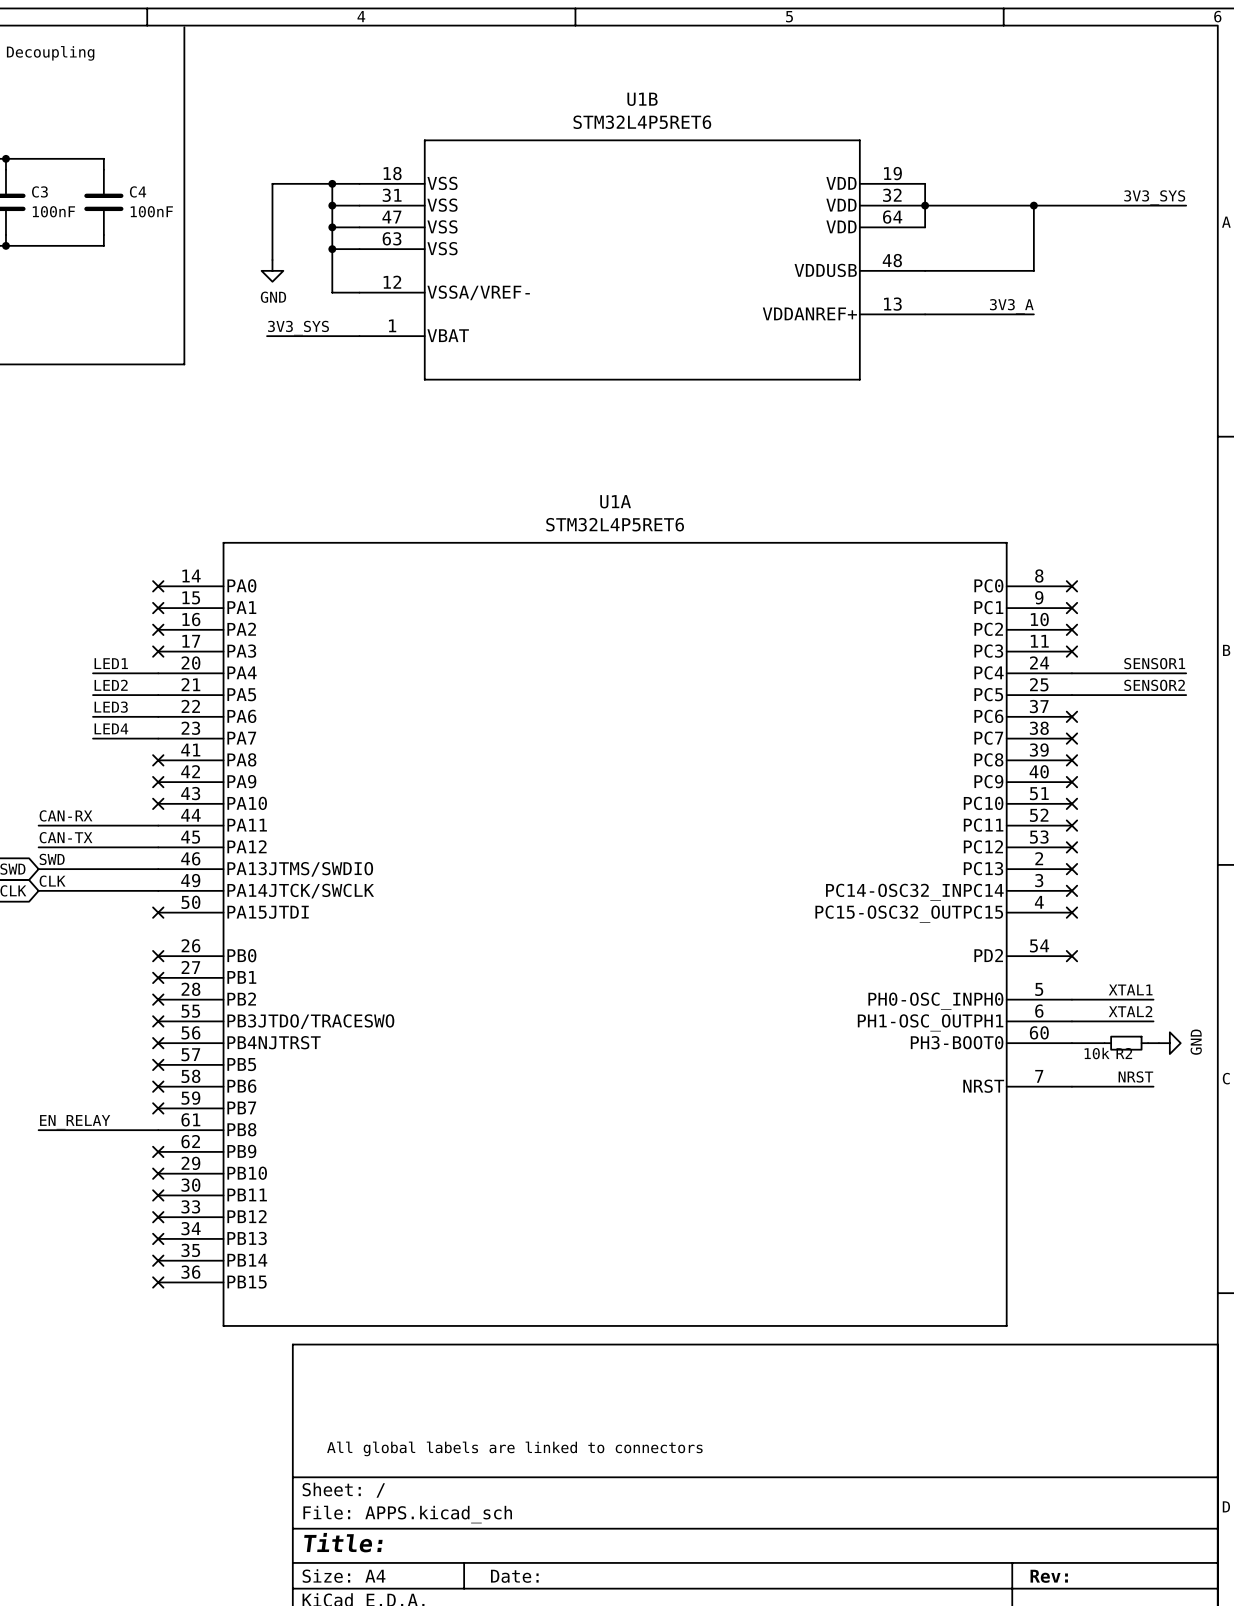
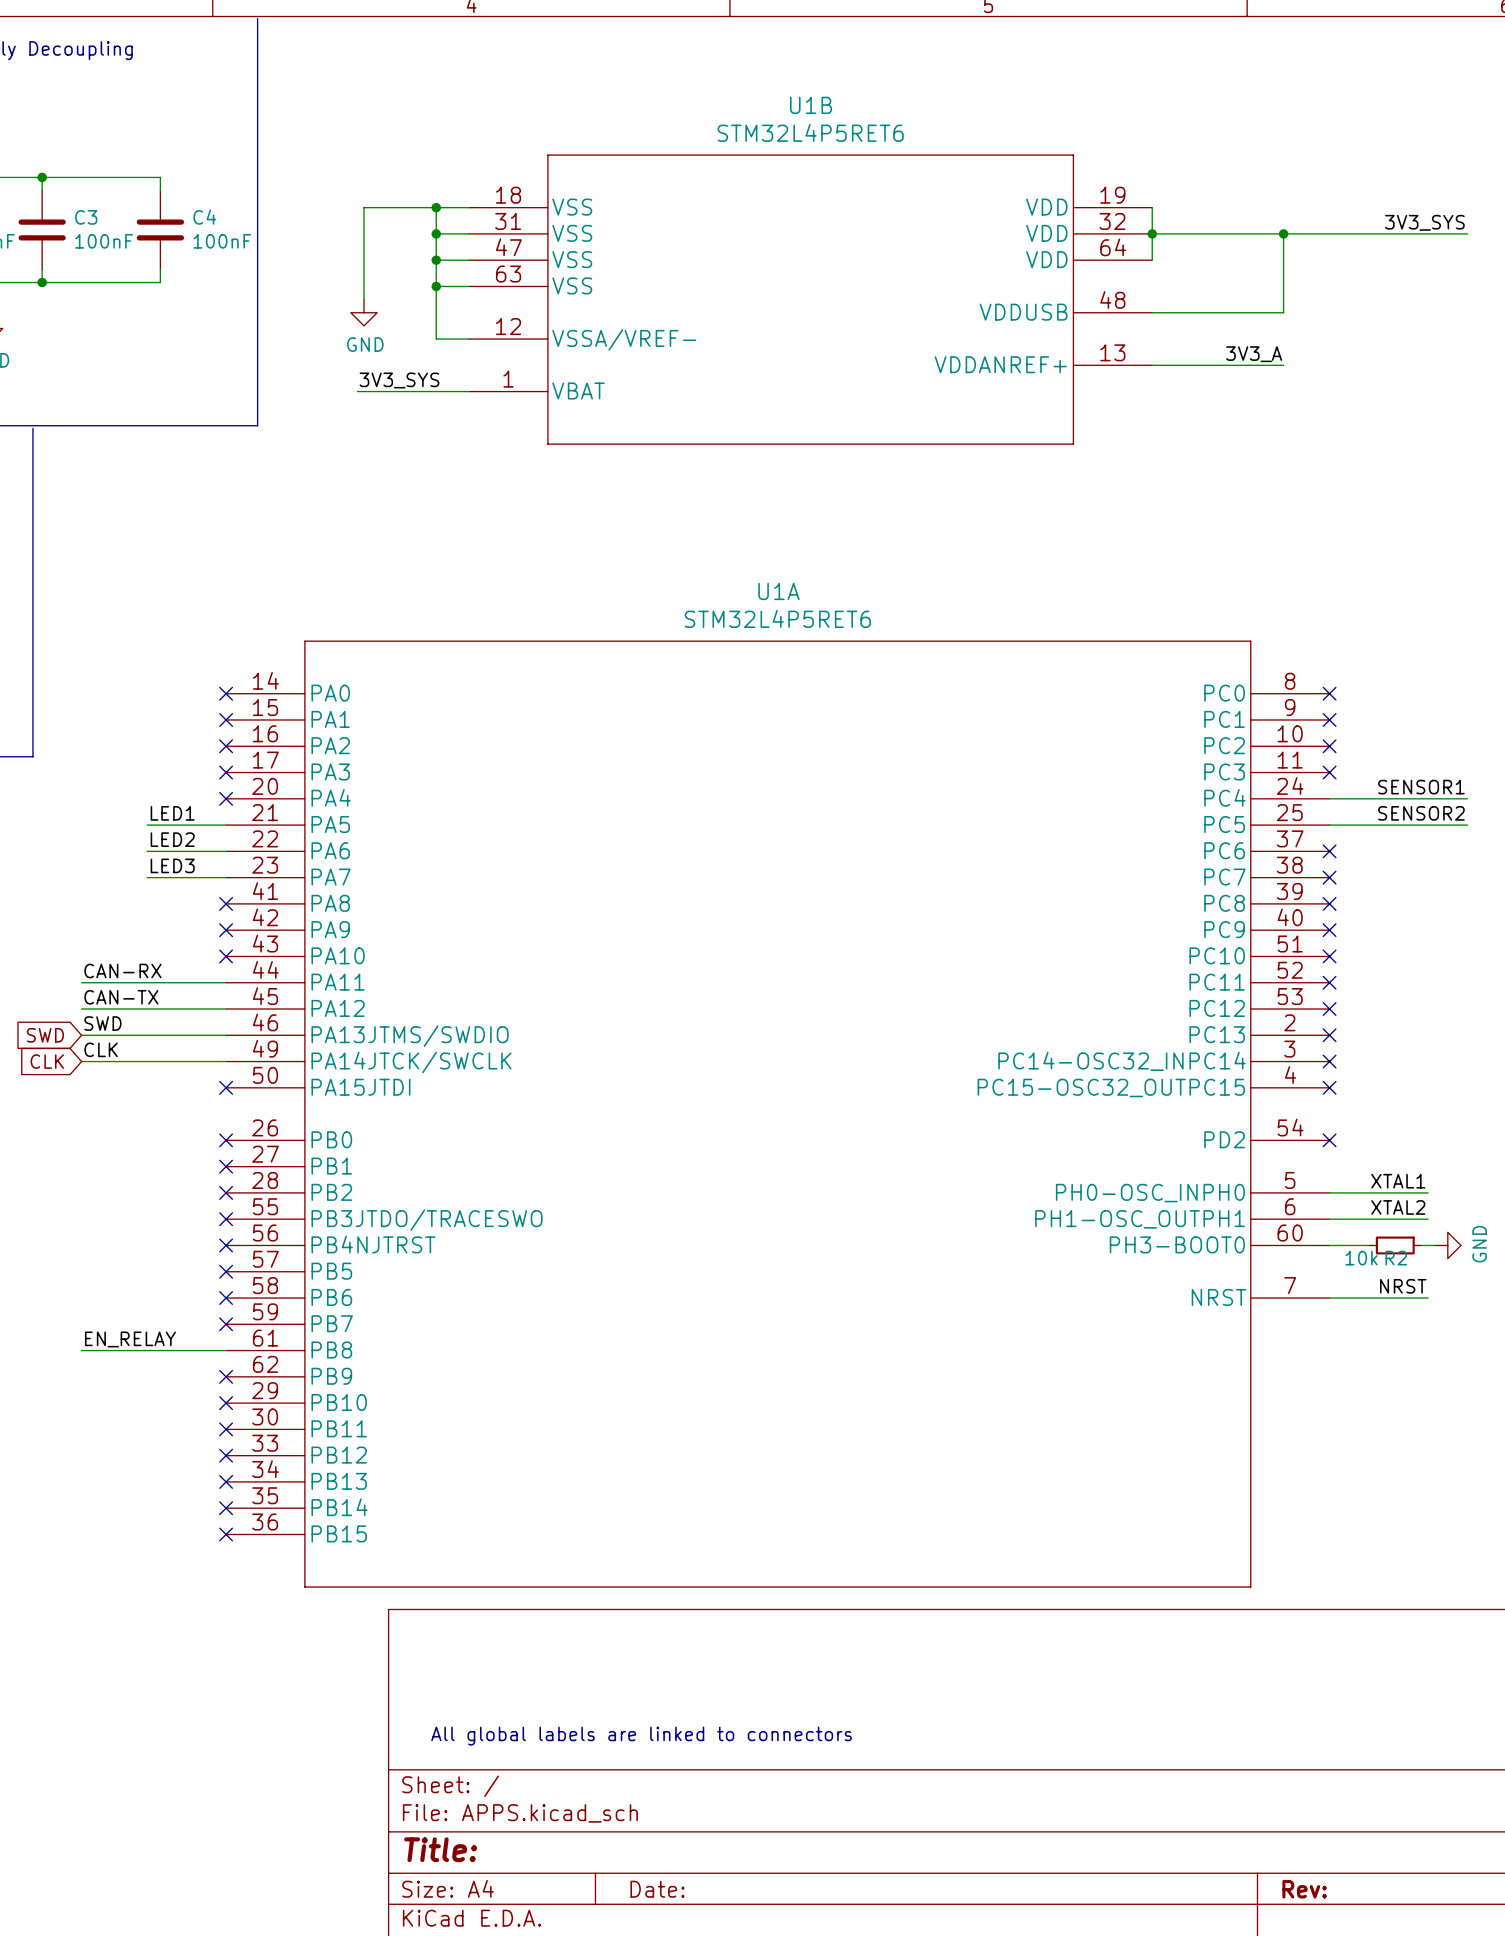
label: LED1 (111, 663) -> none
wire: (93, 673) (158, 673) -> none
no-connect mark: none -> (226, 798)
label: LED2 (111, 685) -> LED1 (172, 813)
label: LED3 (111, 707) -> LED2 (172, 839)
label: LED4 (111, 728) -> LED3 (172, 865)

